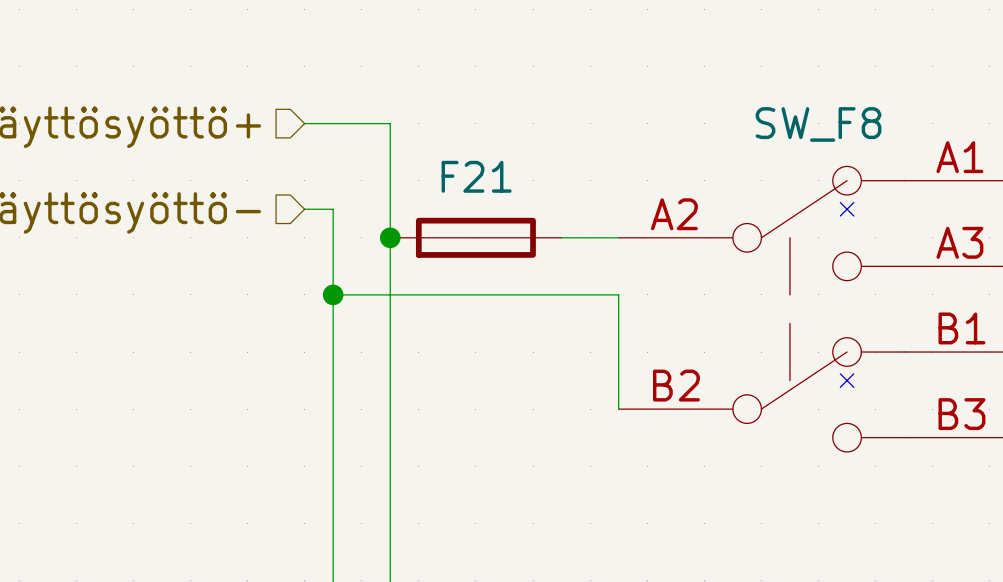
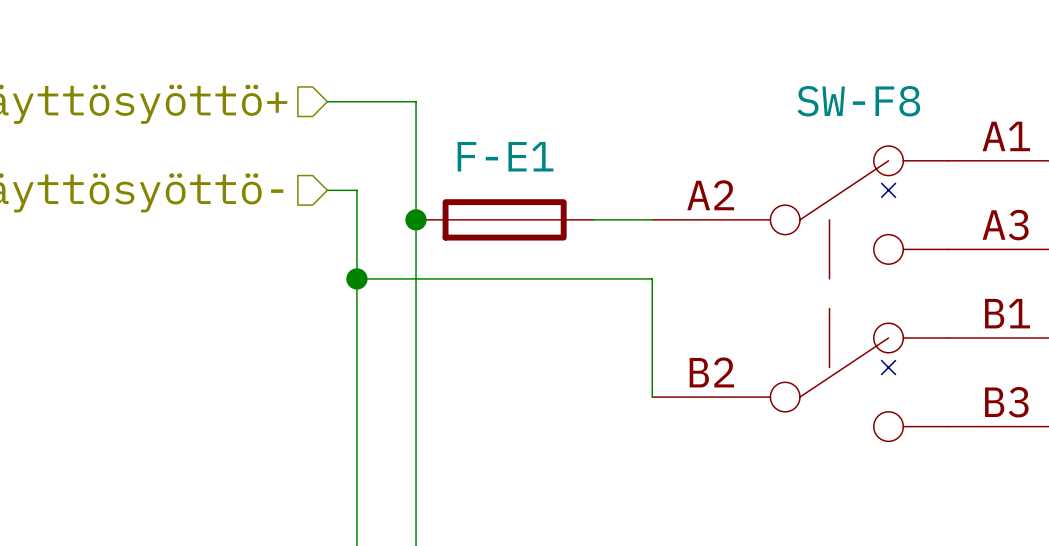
SW_F8 name: SW_F8 (818, 124) -> SW-F8 (858, 101)
F21 name: F21 (476, 176) -> F-E1 (505, 156)

